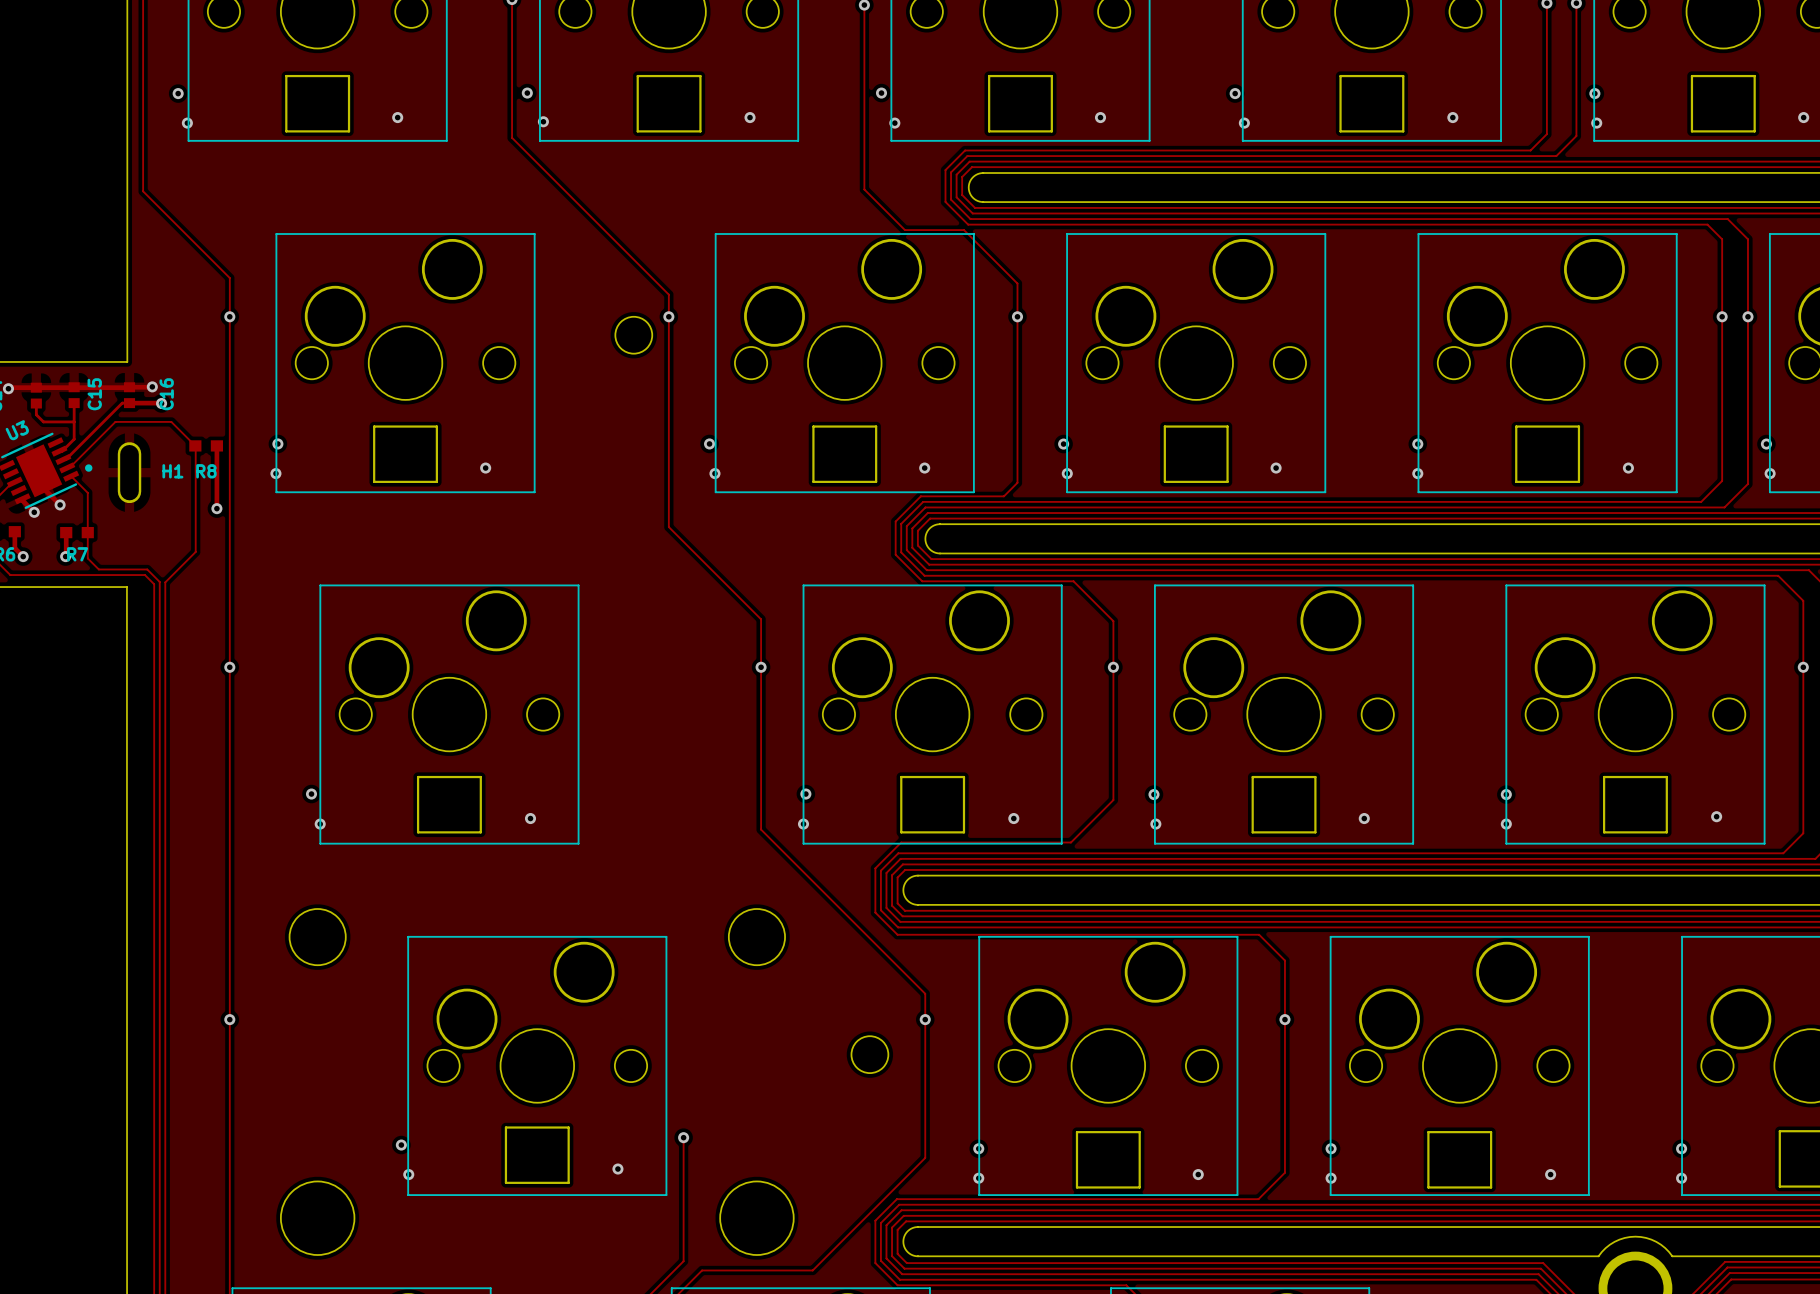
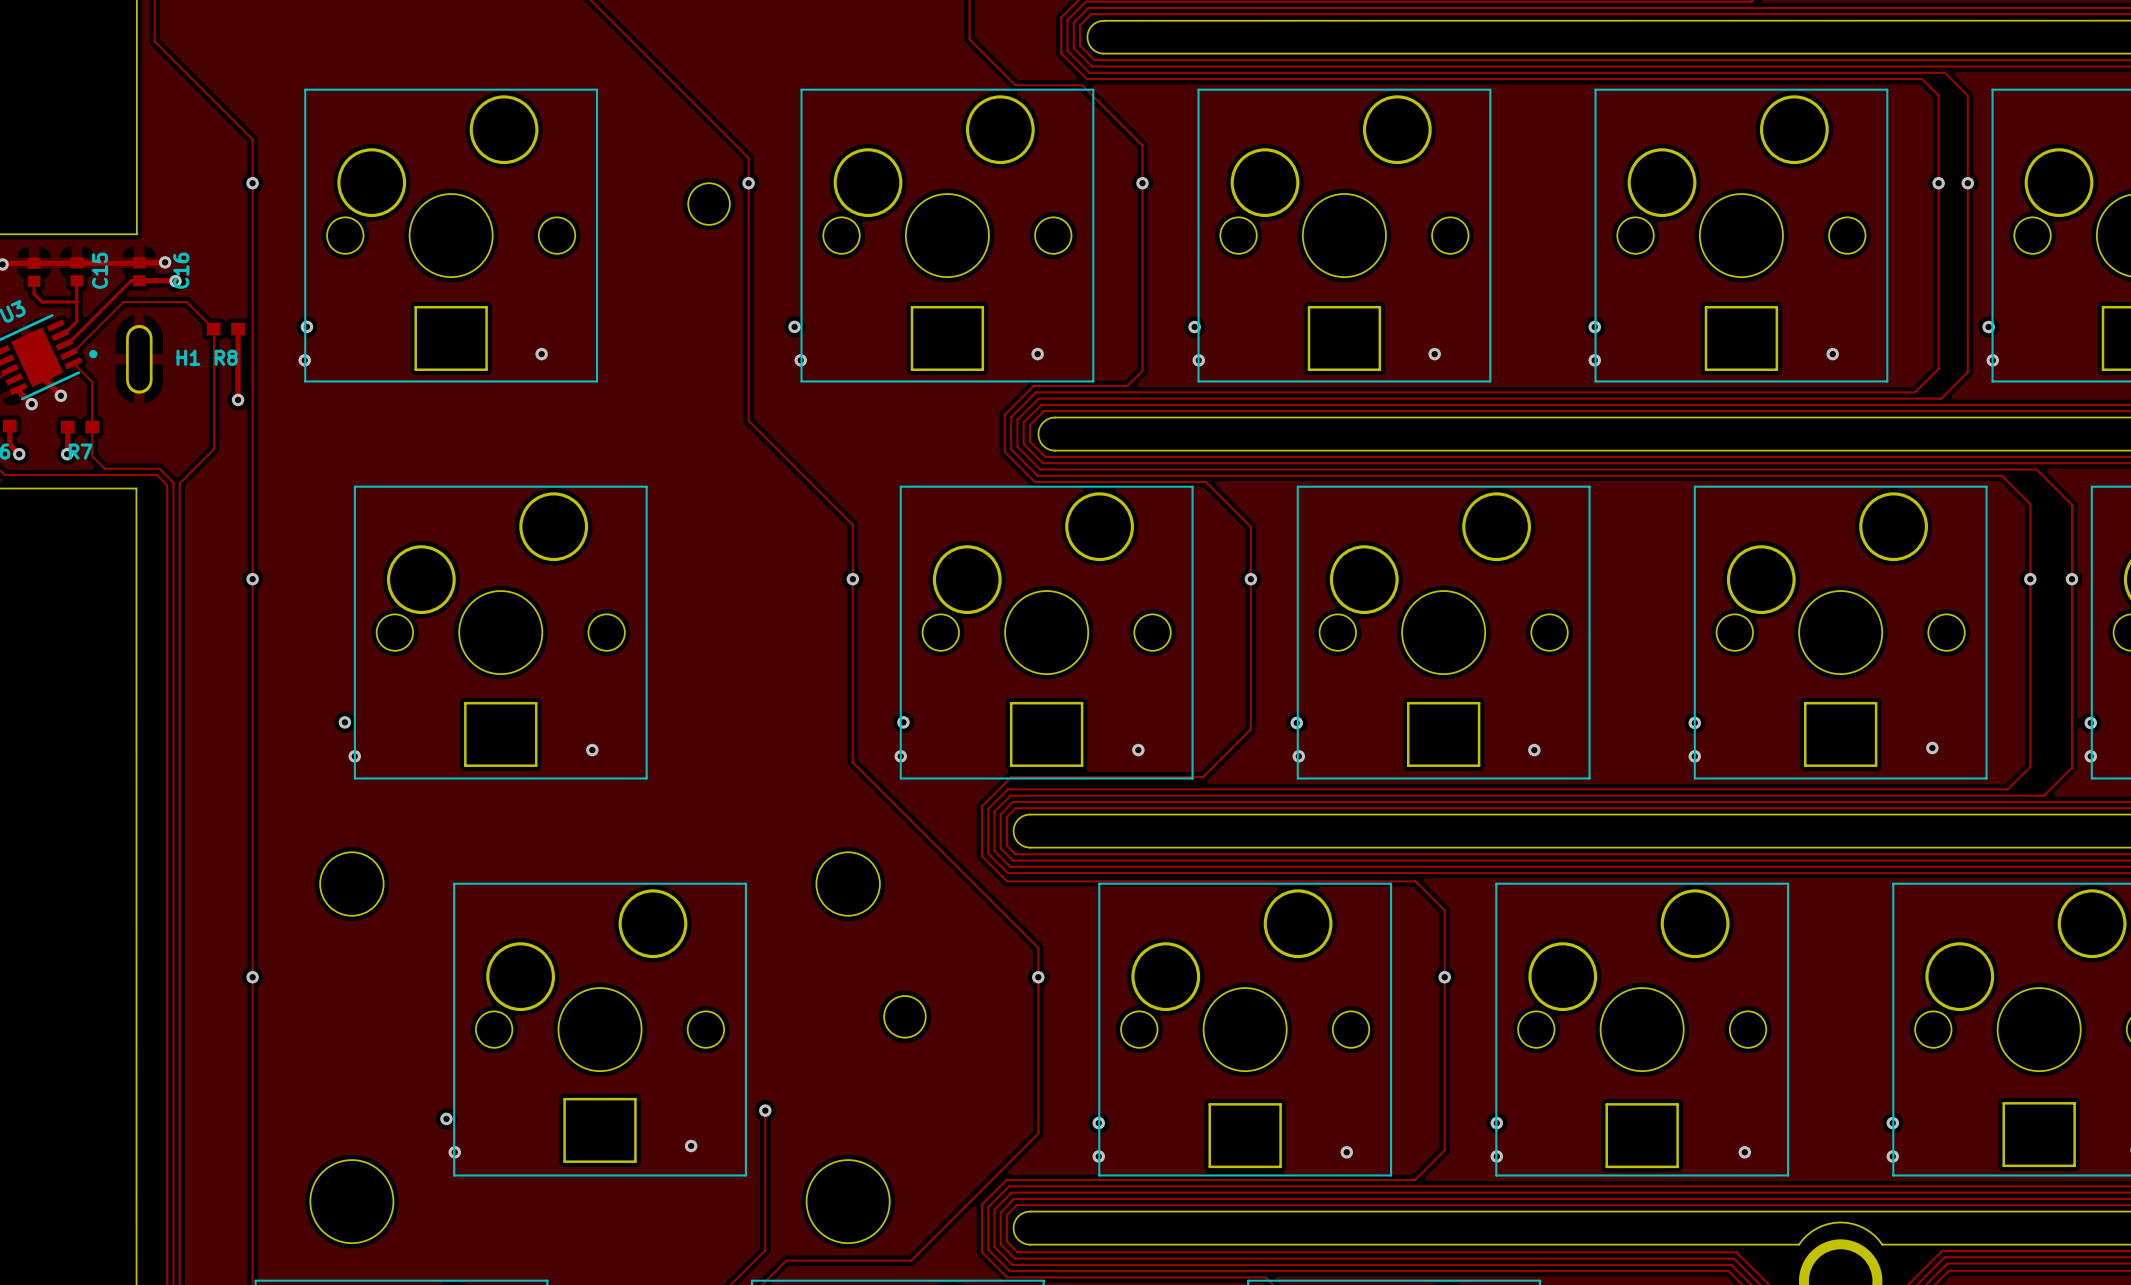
round board edge position: (869, 1054) -> (904, 1016)

